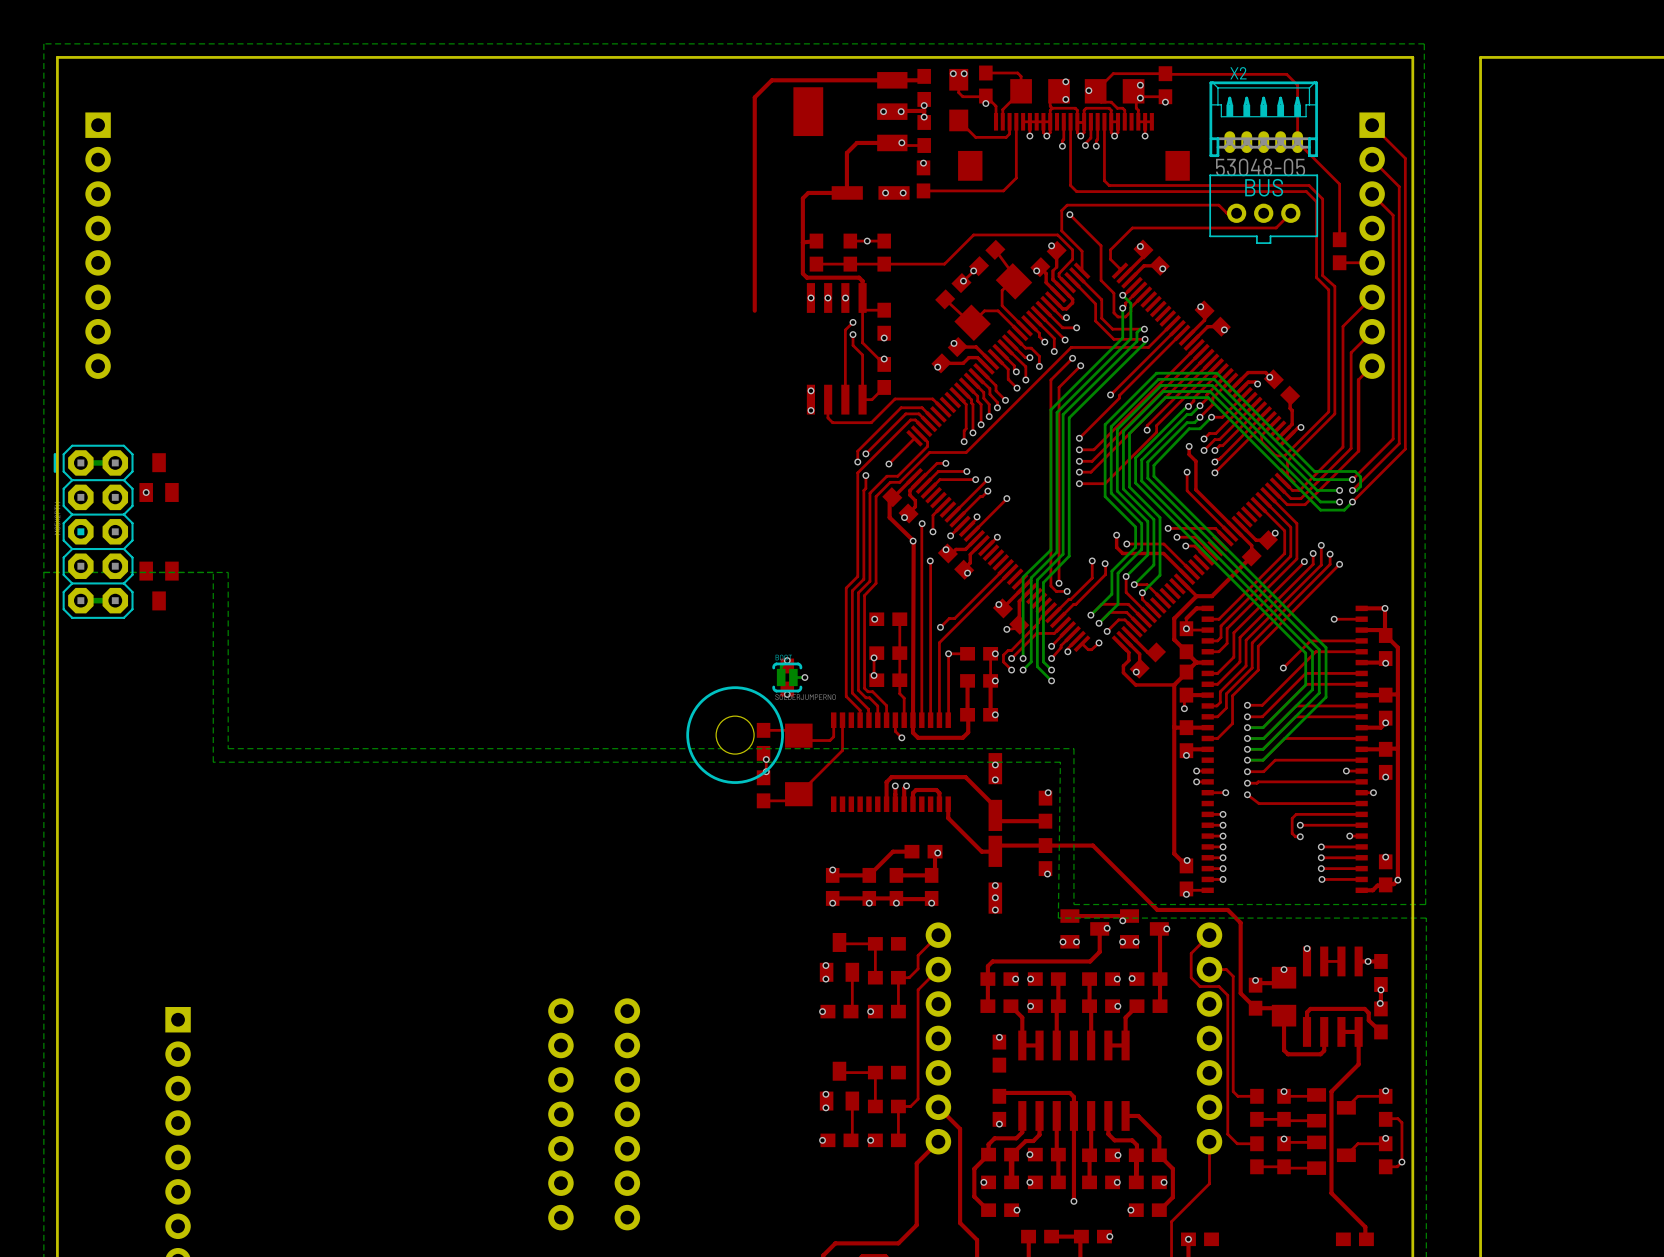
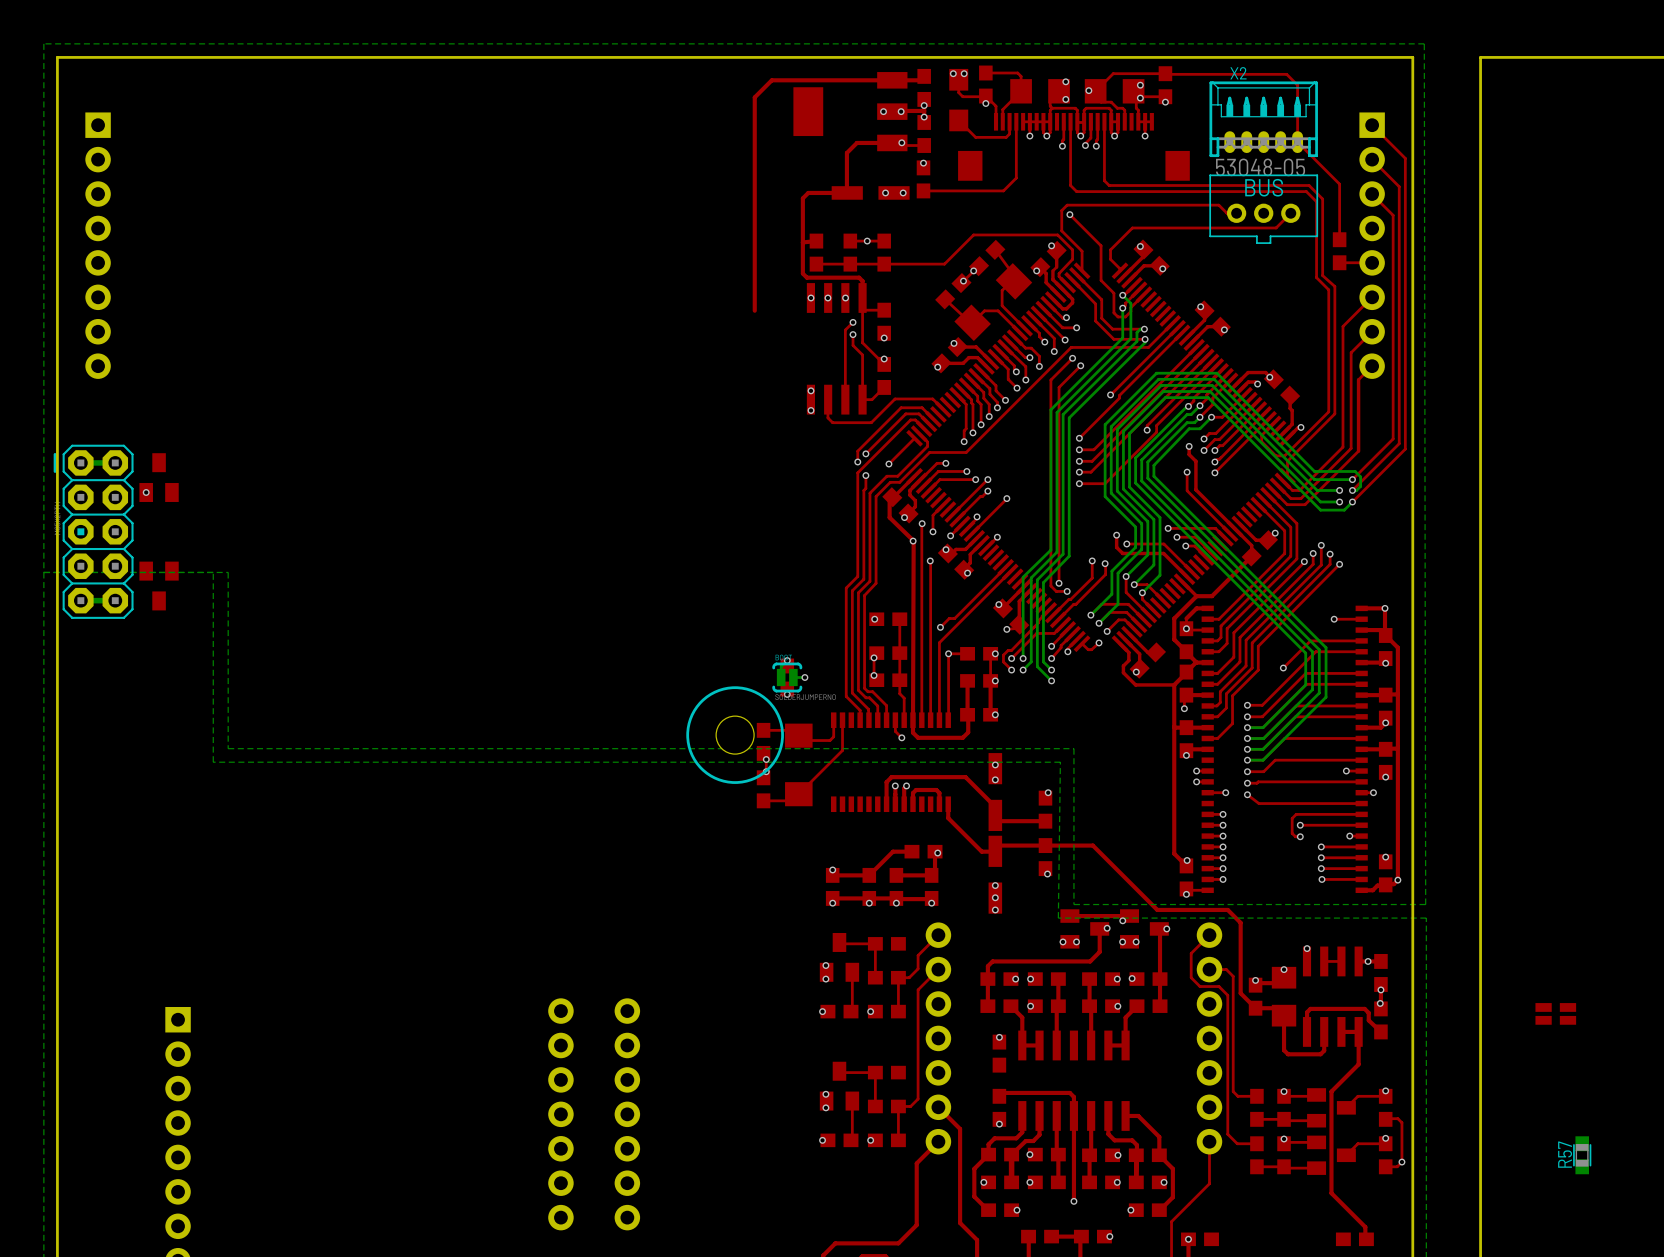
part: none -> (1555, 1013)
R57: none -> (1582, 1155)

